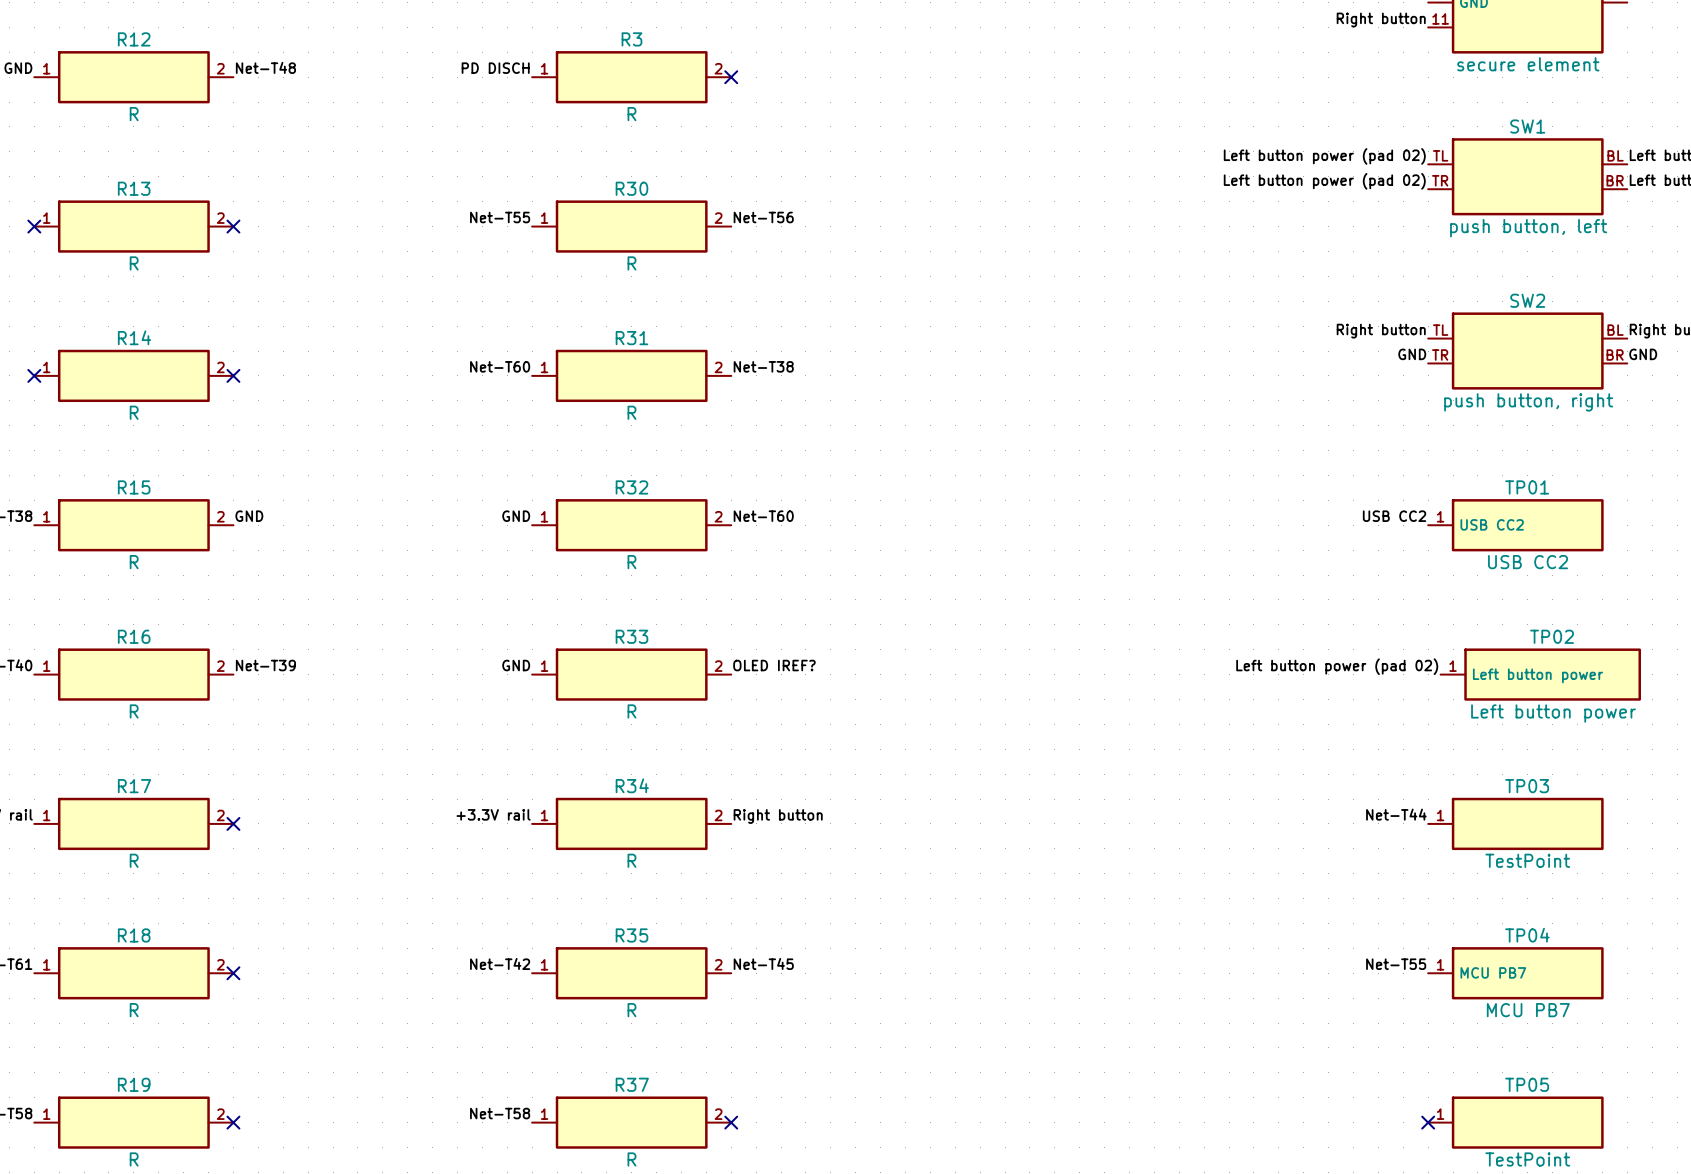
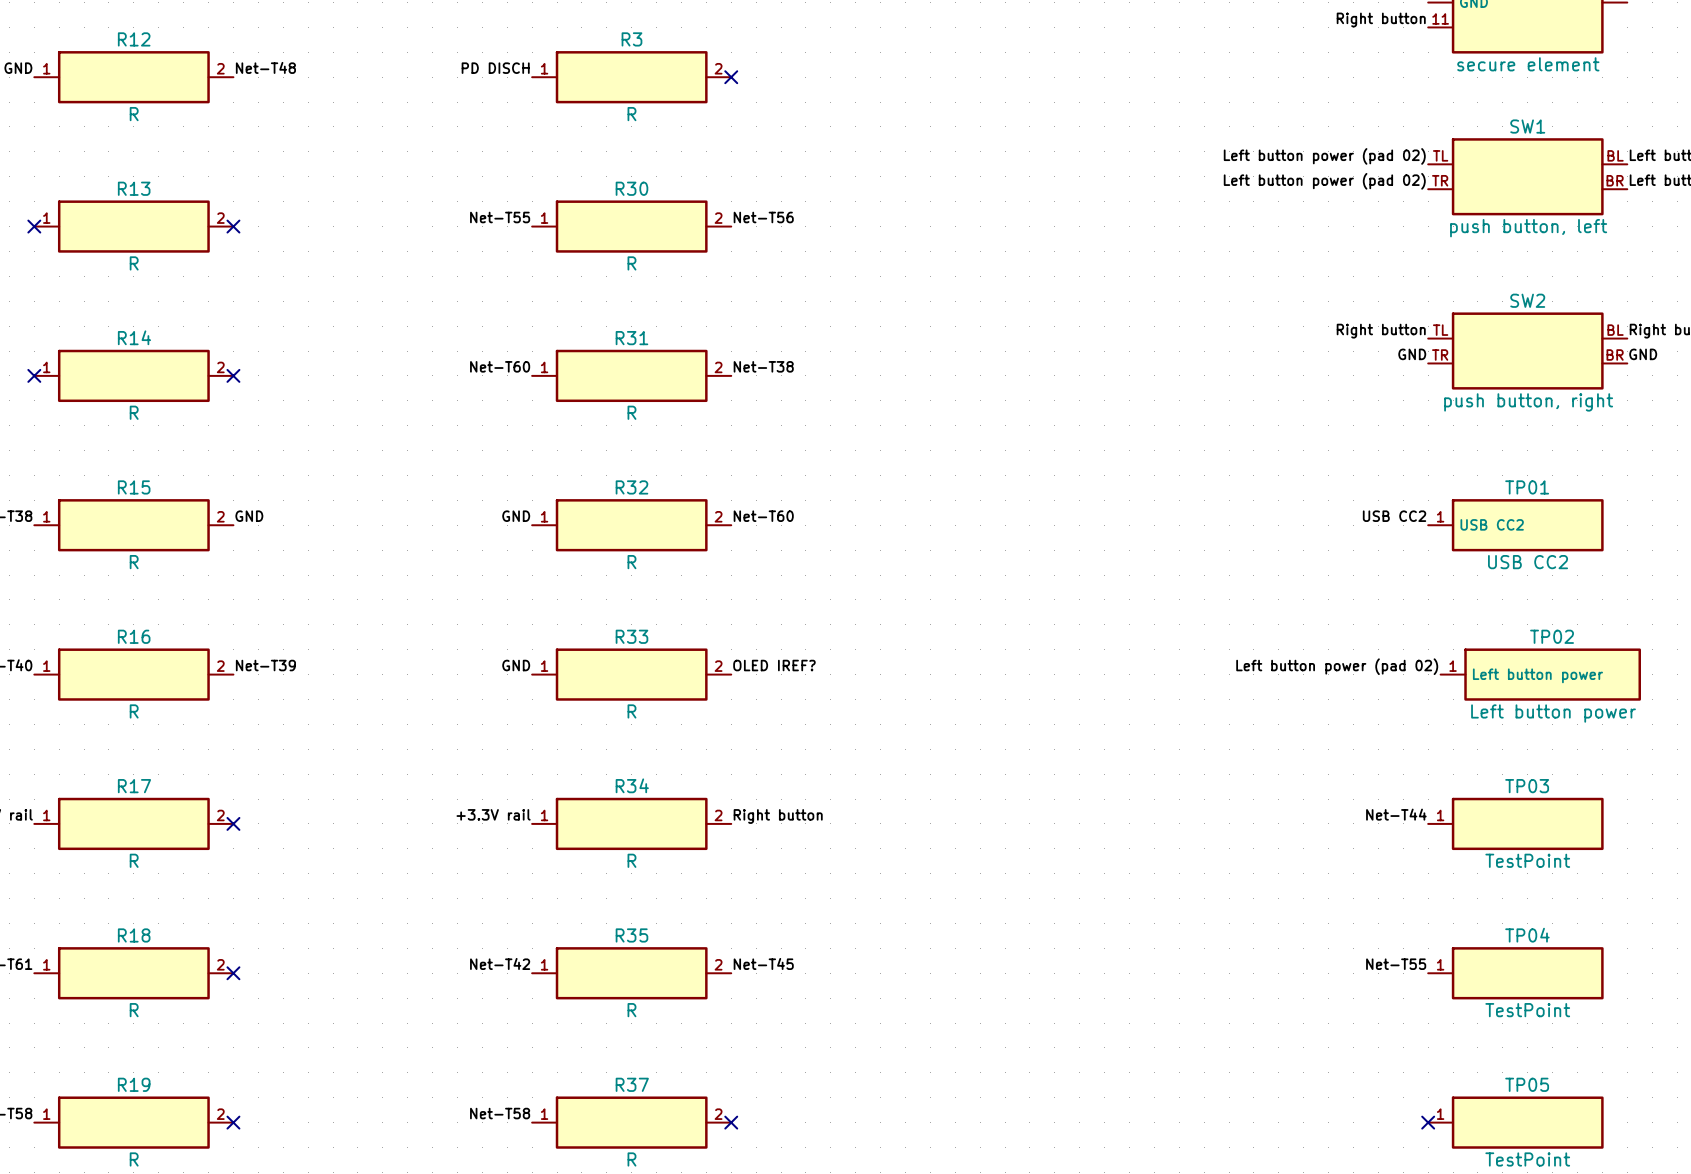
TP04 pin name: MCU PB7 (1493, 972) -> none
TP04 value: MCU PB7 (1528, 1010) -> TestPoint (1527, 1010)

